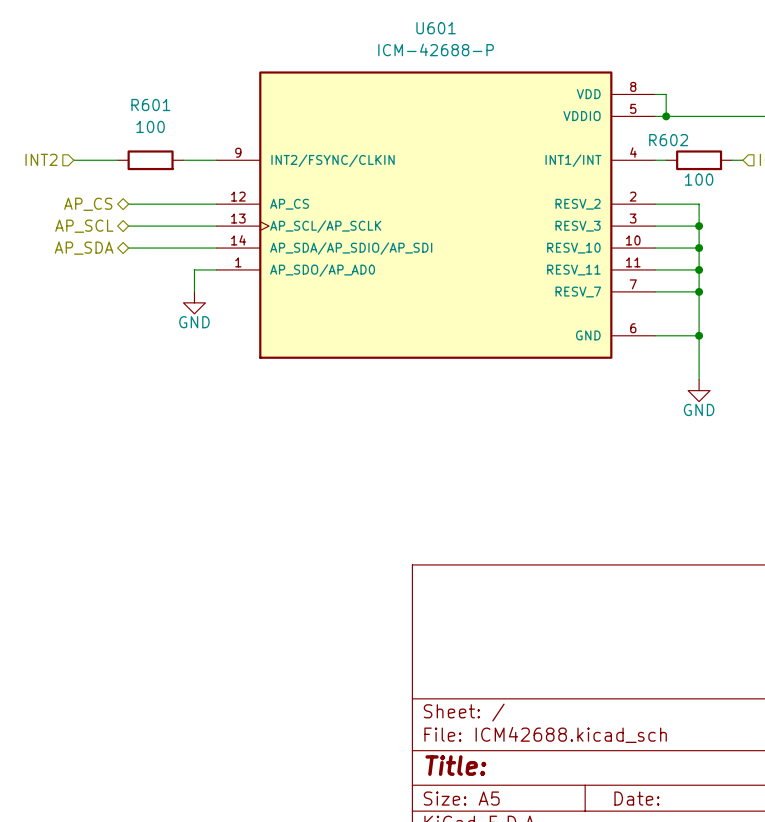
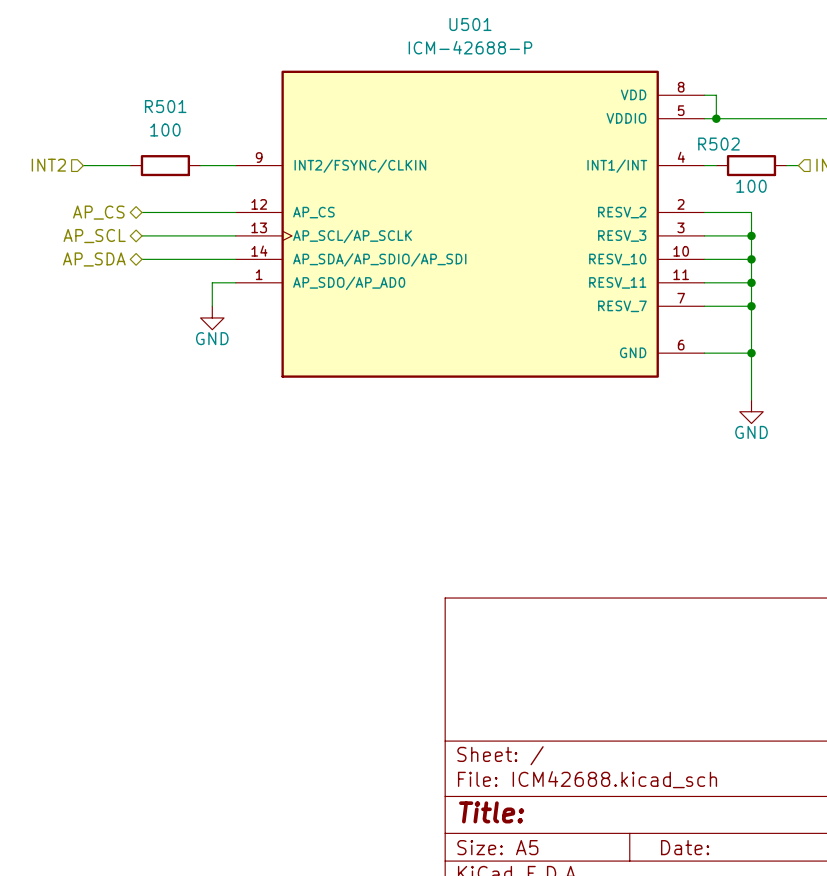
U601 name: U601 (436, 28) -> U501 (470, 24)
R601 name: R601 (150, 105) -> R501 (165, 106)
R602 name: R602 (668, 140) -> R502 (718, 144)

